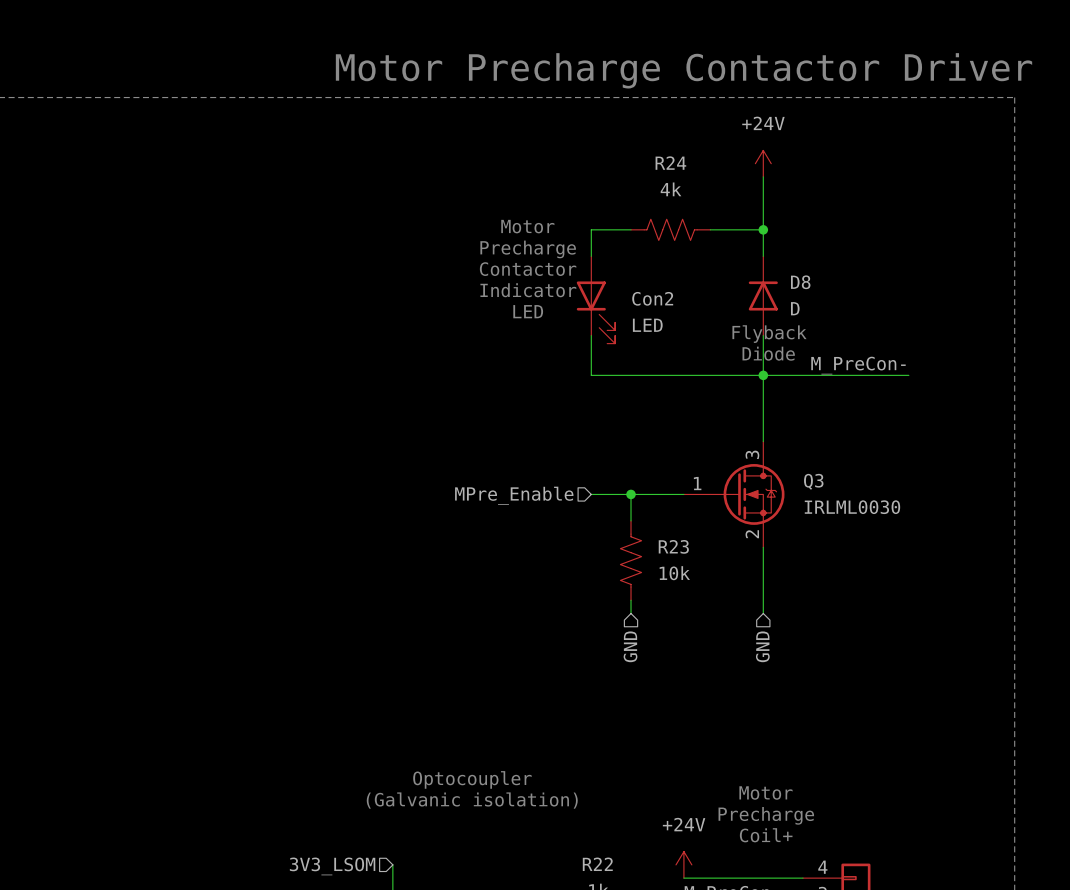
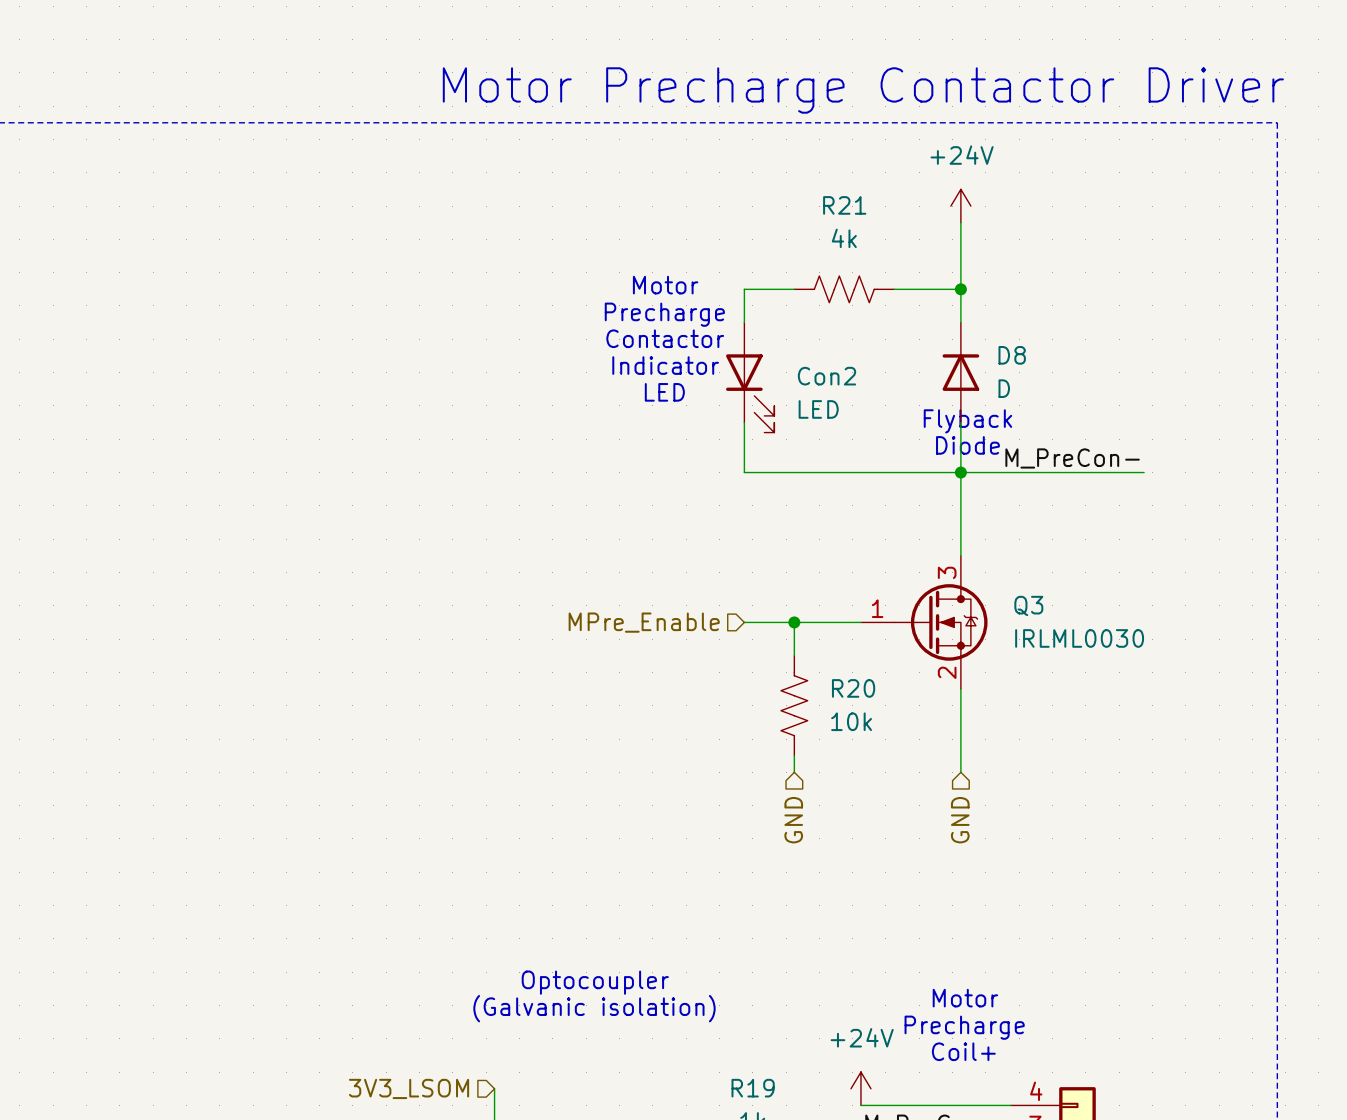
R24 name: R24 (670, 163) -> R21 (844, 205)
R23 name: R23 (673, 546) -> R20 (853, 688)
R22 name: R22 (597, 864) -> R19 (753, 1088)

